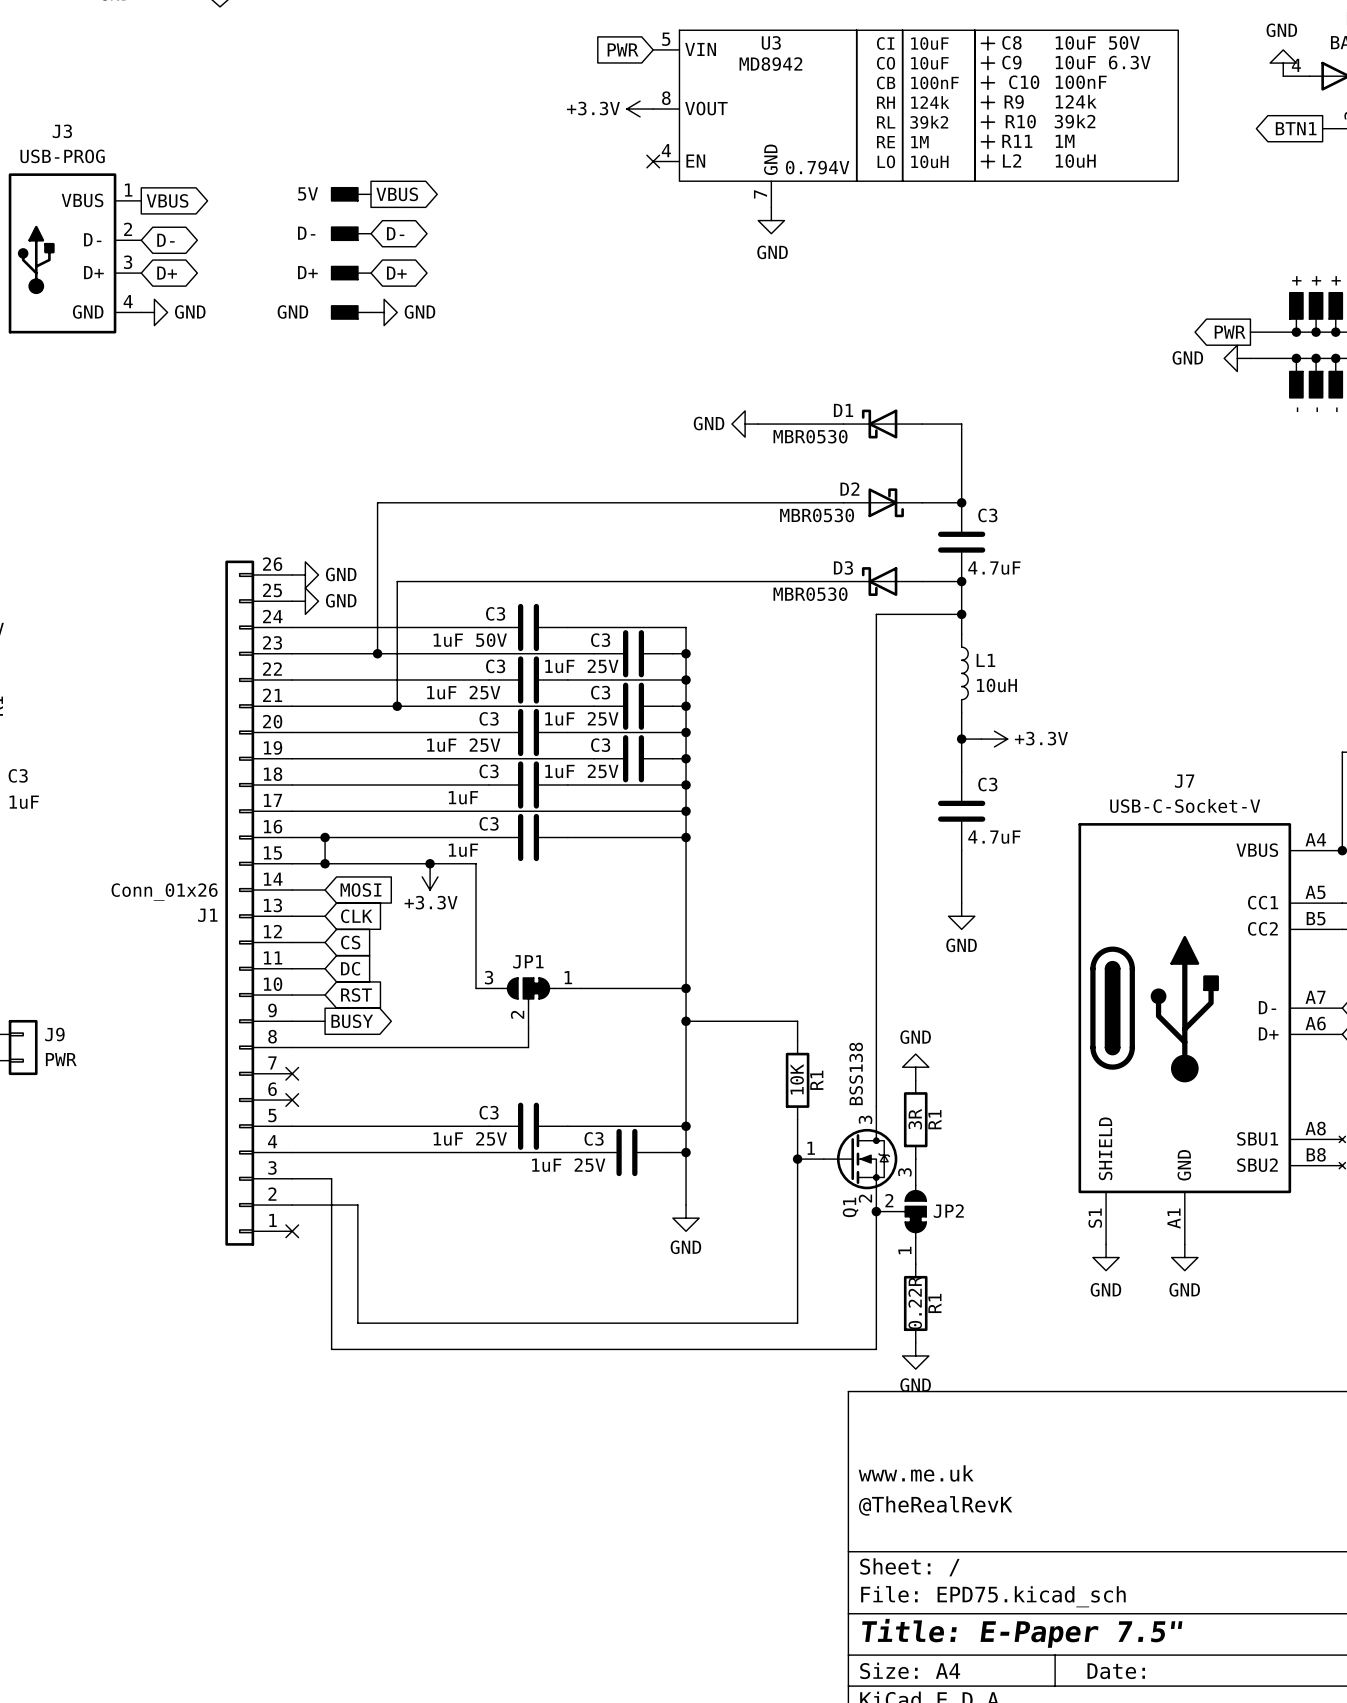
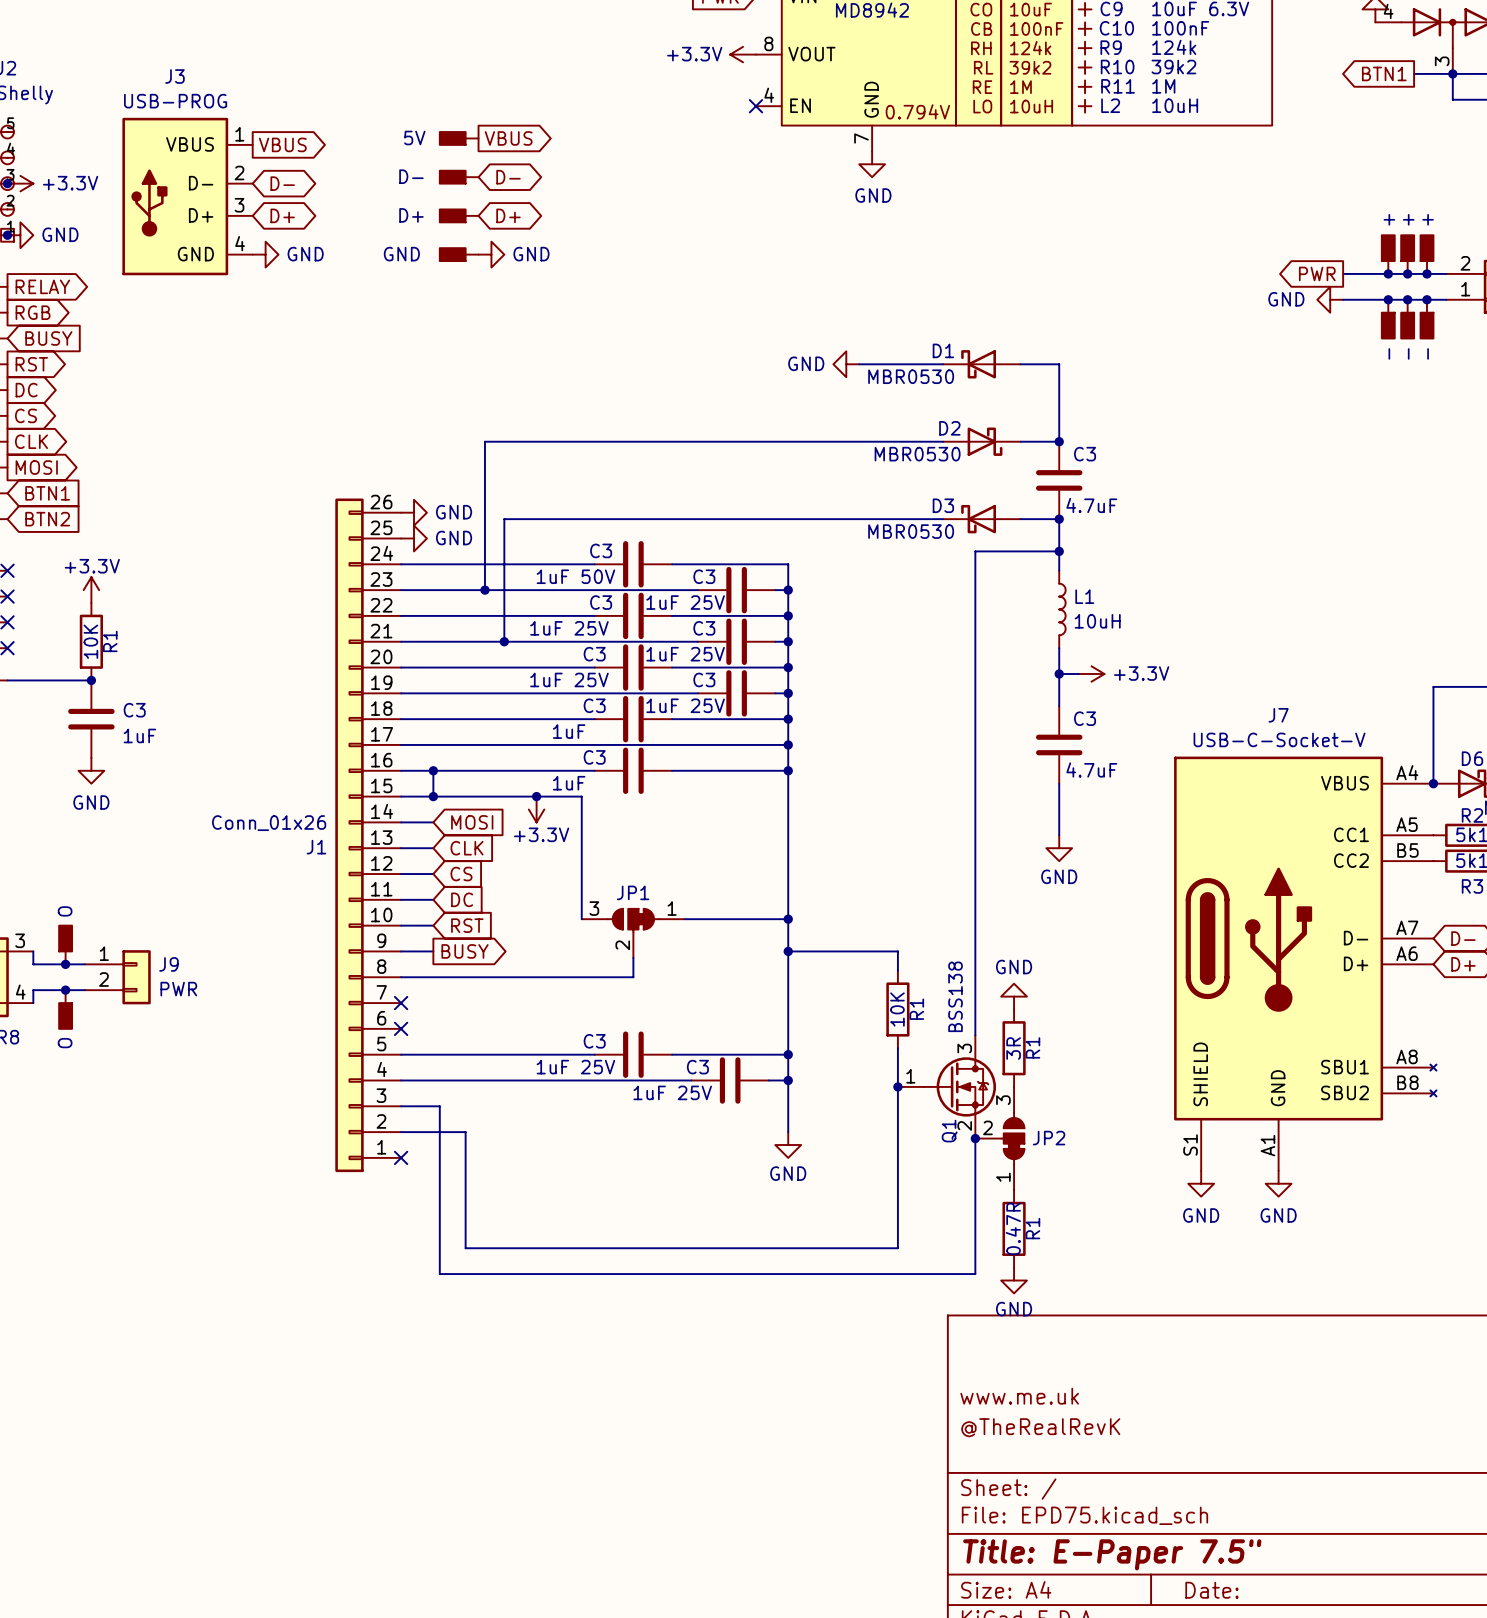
R1 value: 0.22R (915, 1302) -> 0.47R (1013, 1228)

